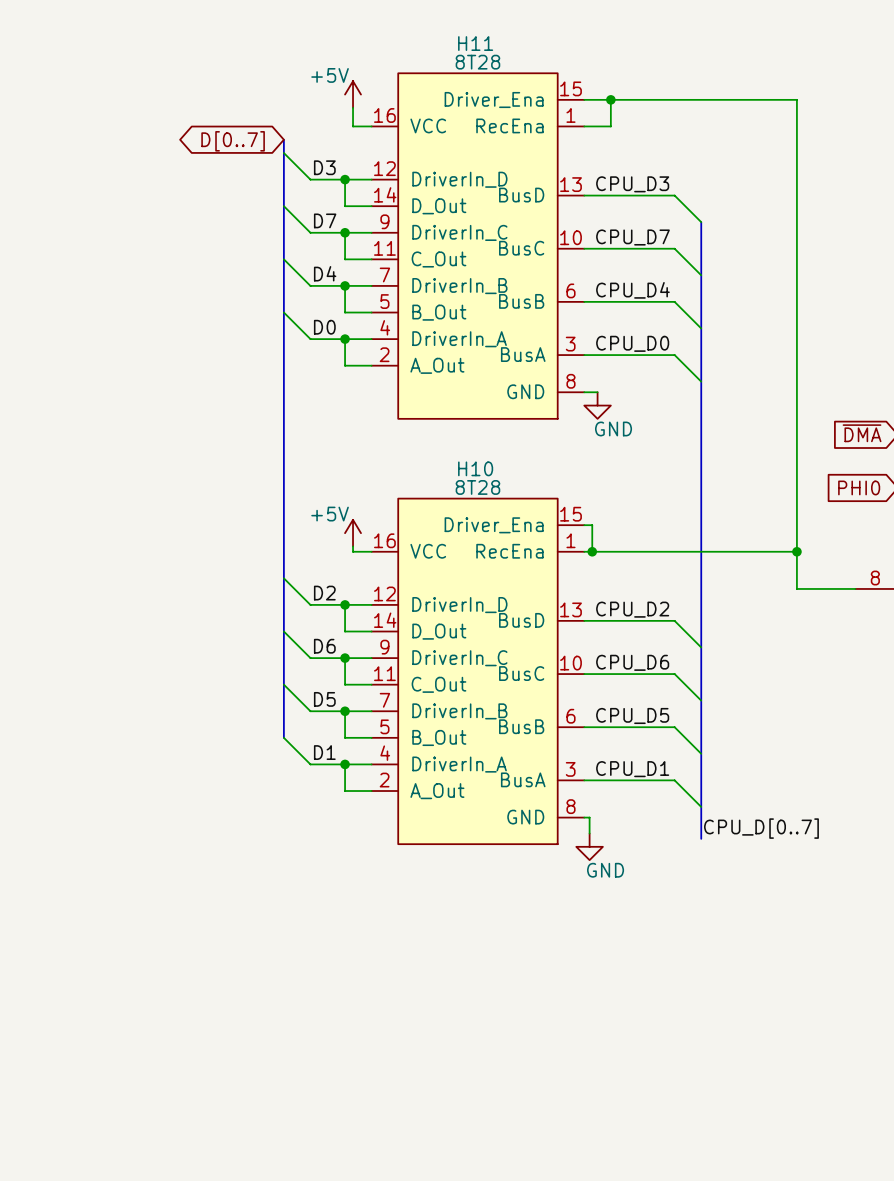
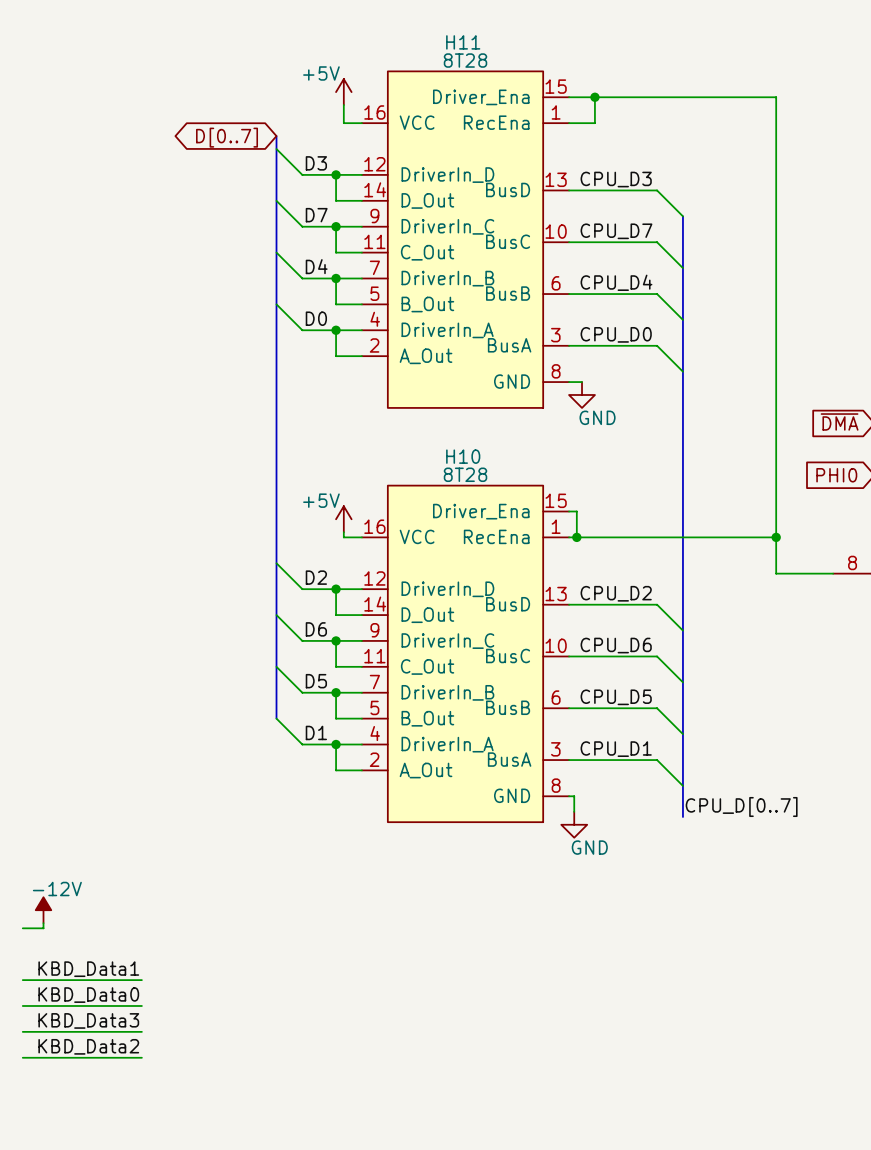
power symbol: none -> -12V (43, 910)
wire: none -> (43, 923) (43, 928) (22, 928)
label: none -> KBD_Data1 (88, 969)
wire: none -> (22, 980) (141, 980)
label: none -> KBD_Data0 (88, 995)
wire: none -> (22, 1005) (141, 1005)
label: none -> KBD_Data3 (88, 1020)
wire: none -> (22, 1031) (141, 1031)
label: none -> KBD_Data2 (88, 1046)
wire: none -> (22, 1057) (141, 1057)

